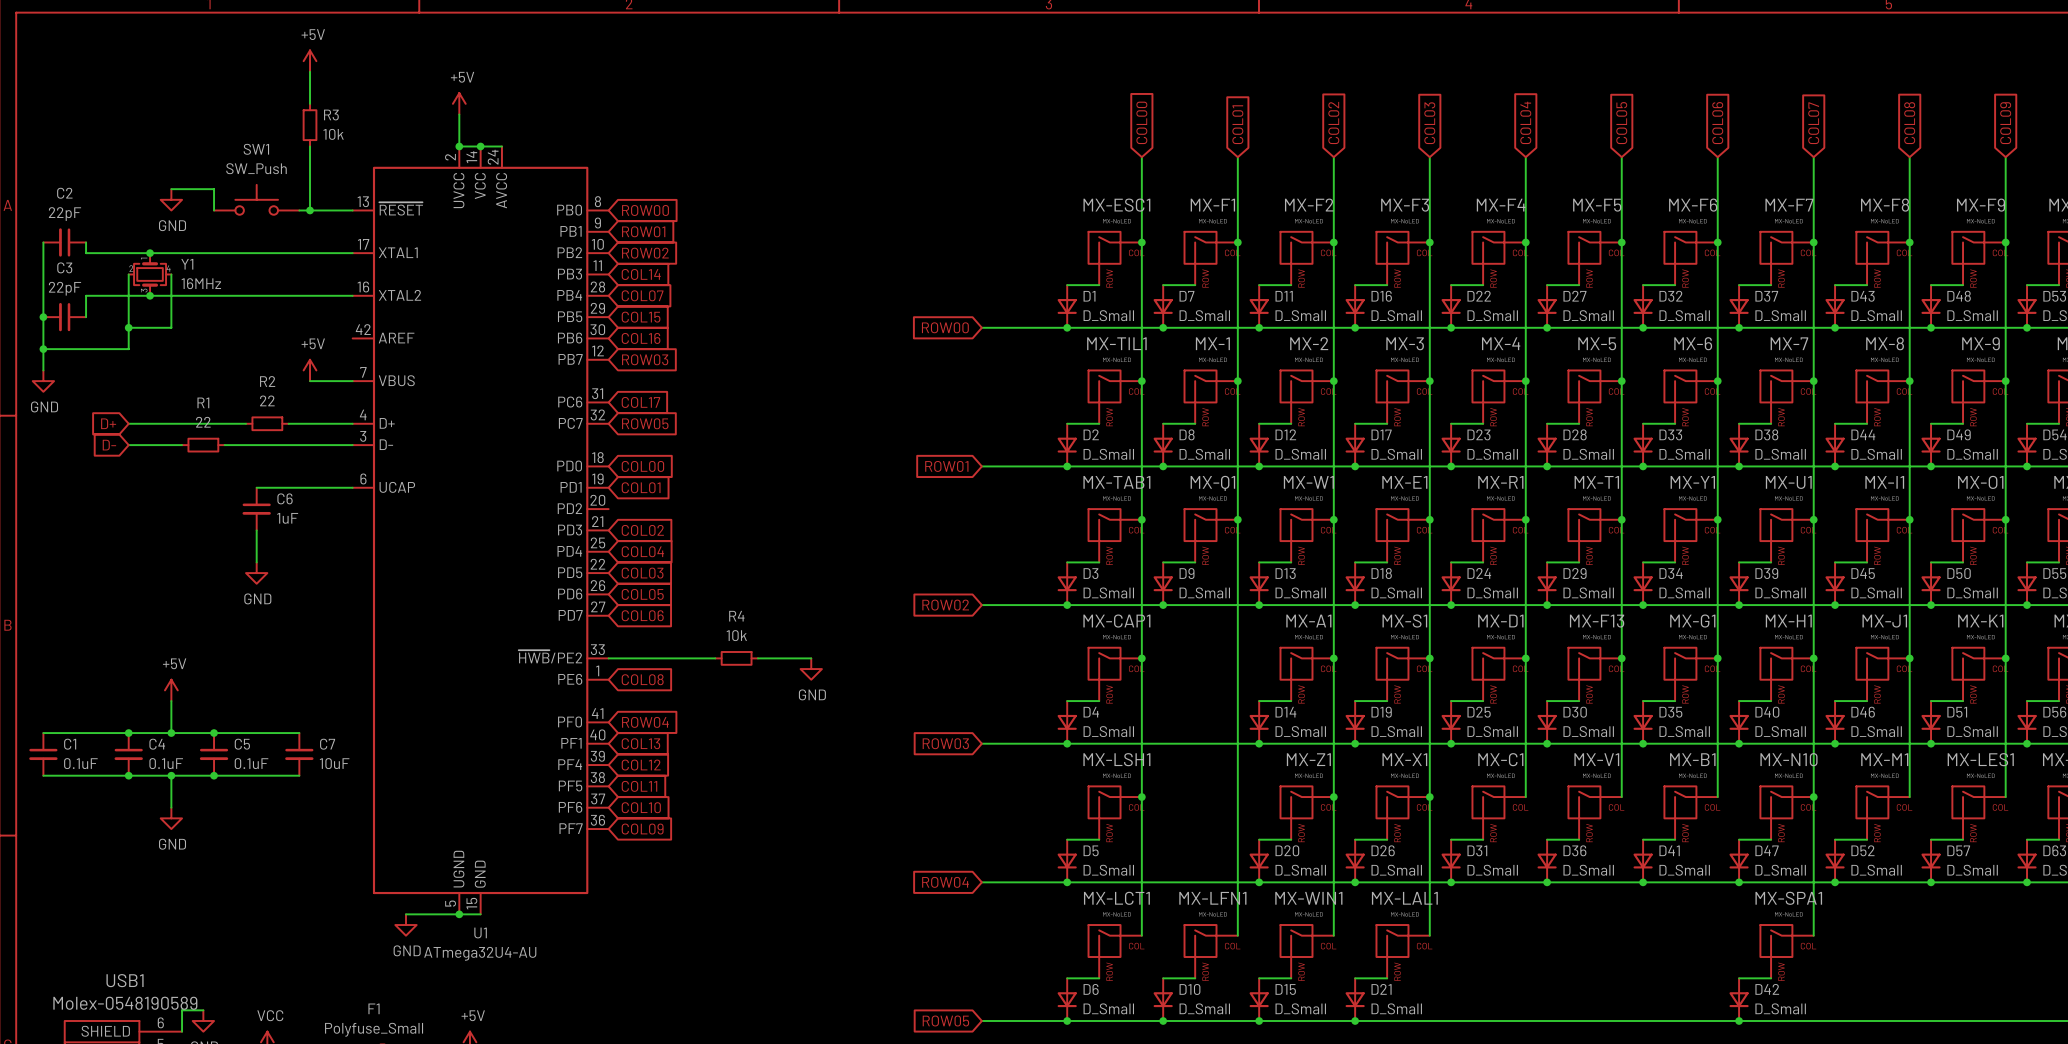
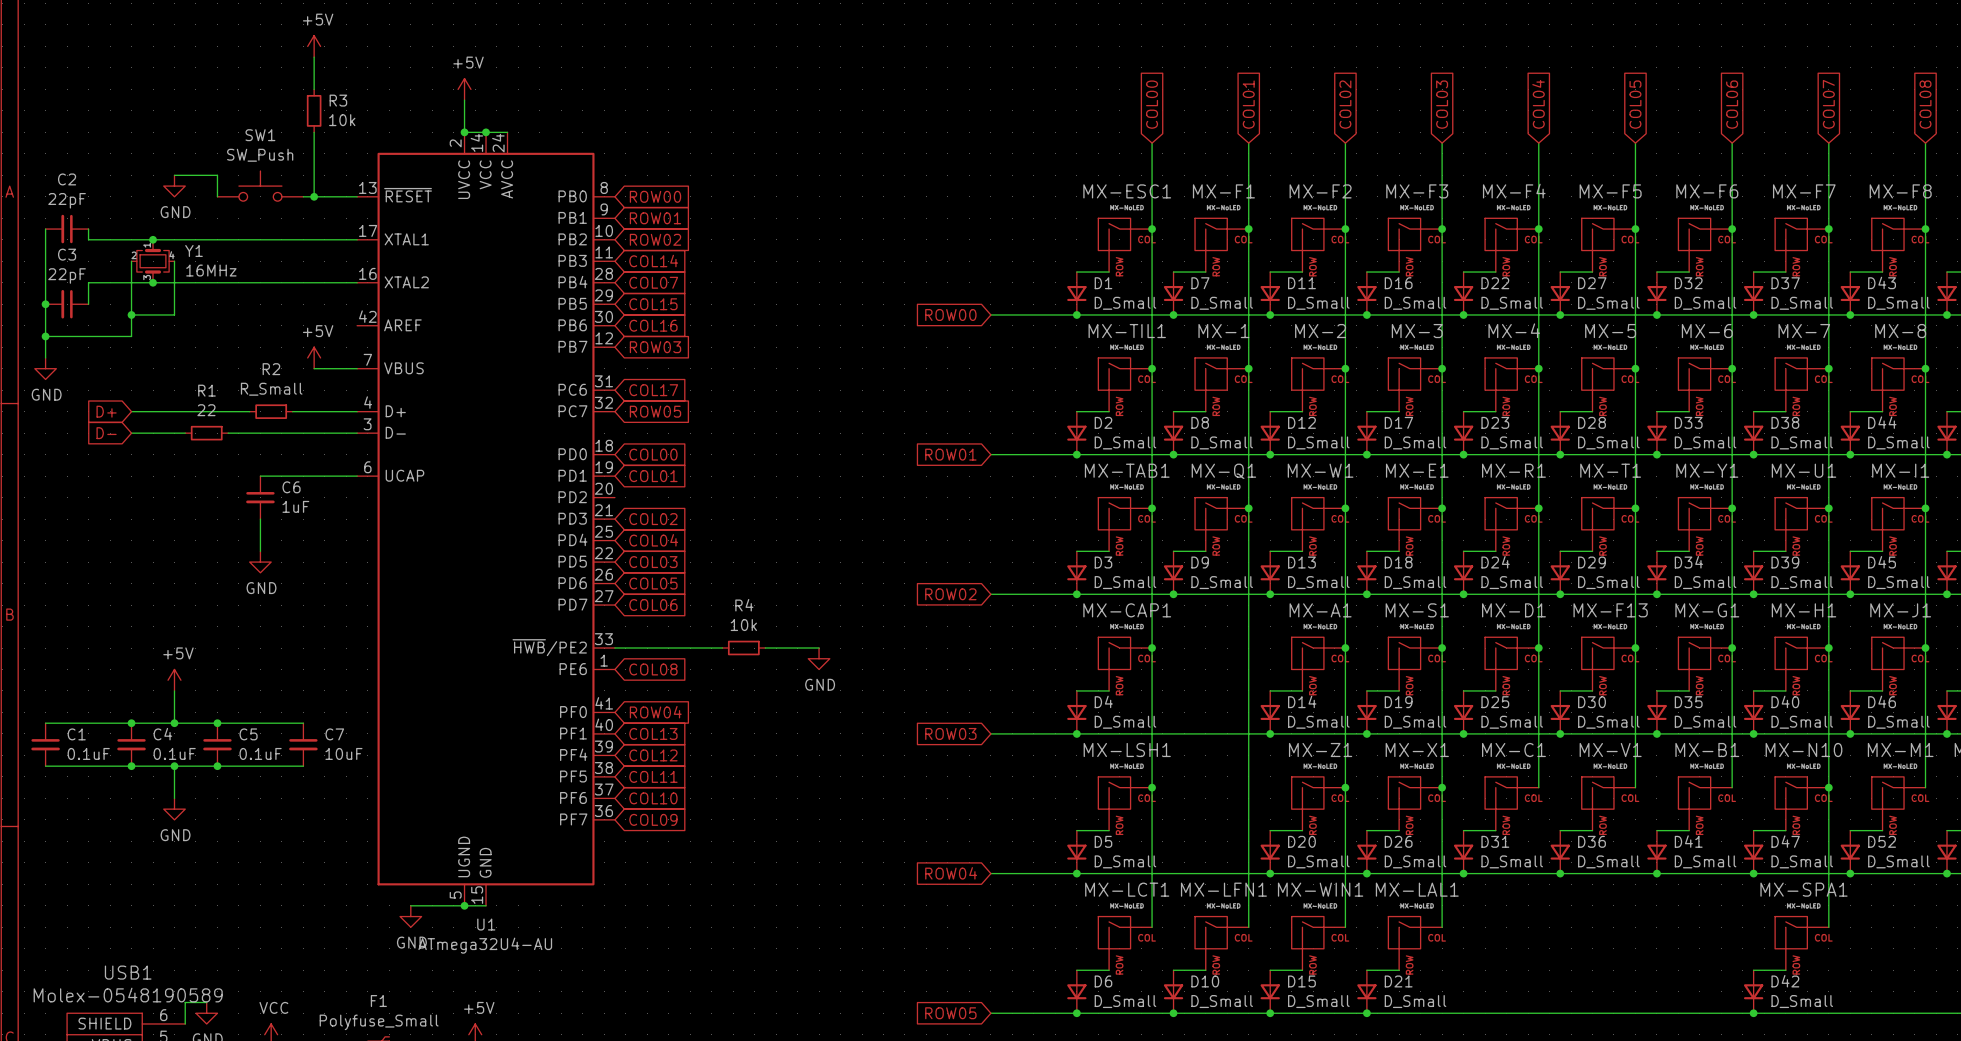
R2 value: 22 (267, 400) -> R_Small (271, 389)

